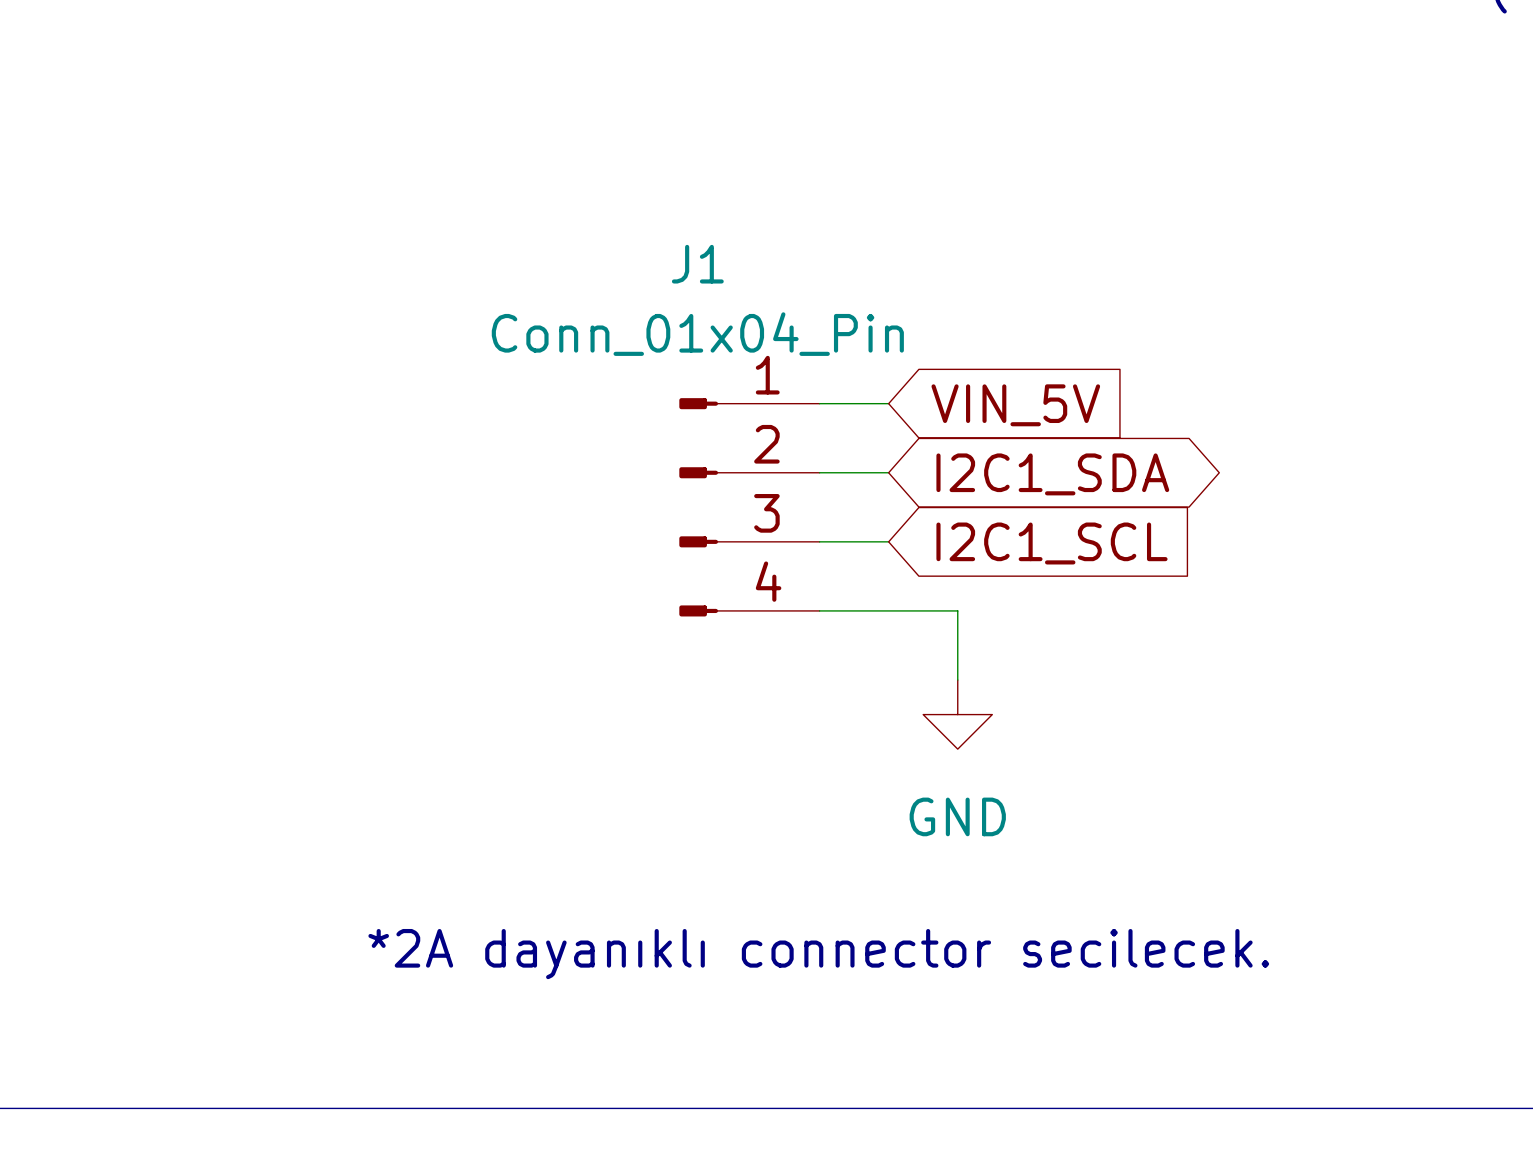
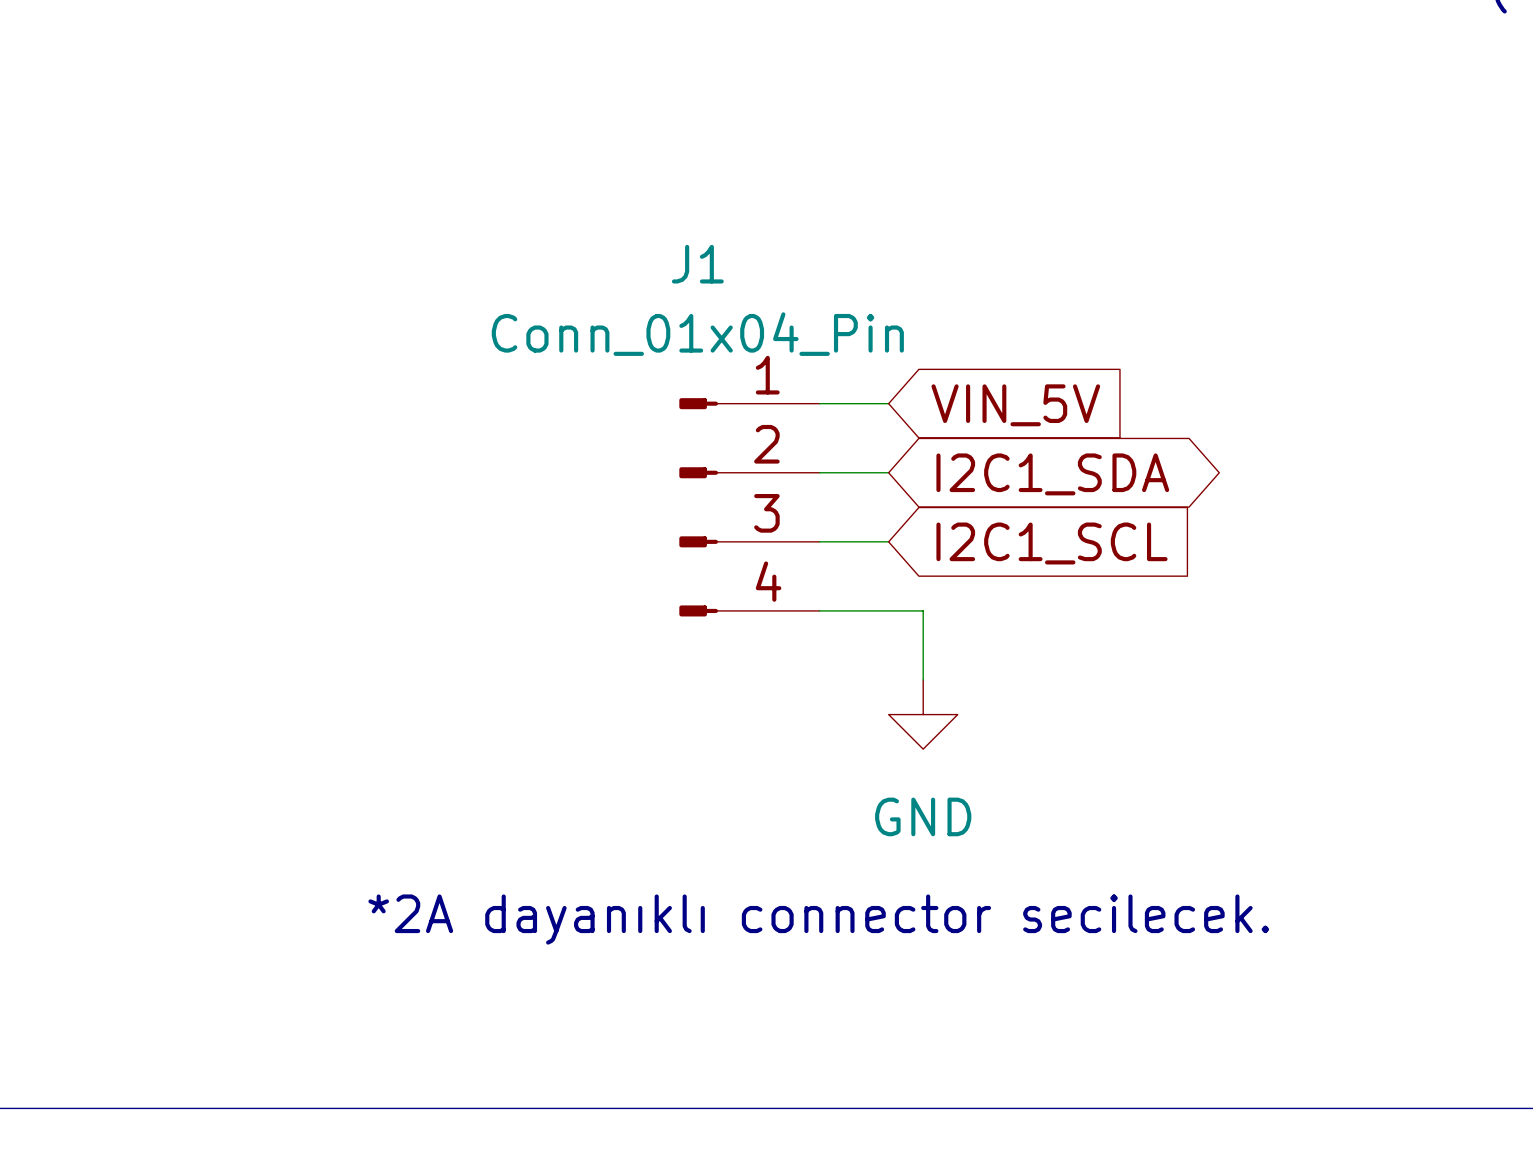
wire: (923, 610) (957, 610) (957, 680) -> (923, 610) (923, 680)
power symbol position: GND (957, 714) -> GND (923, 714)
text position: *2A dayanıklı connector secilecek. (818, 954) -> *2A dayanıklı connector secilecek. (818, 919)

